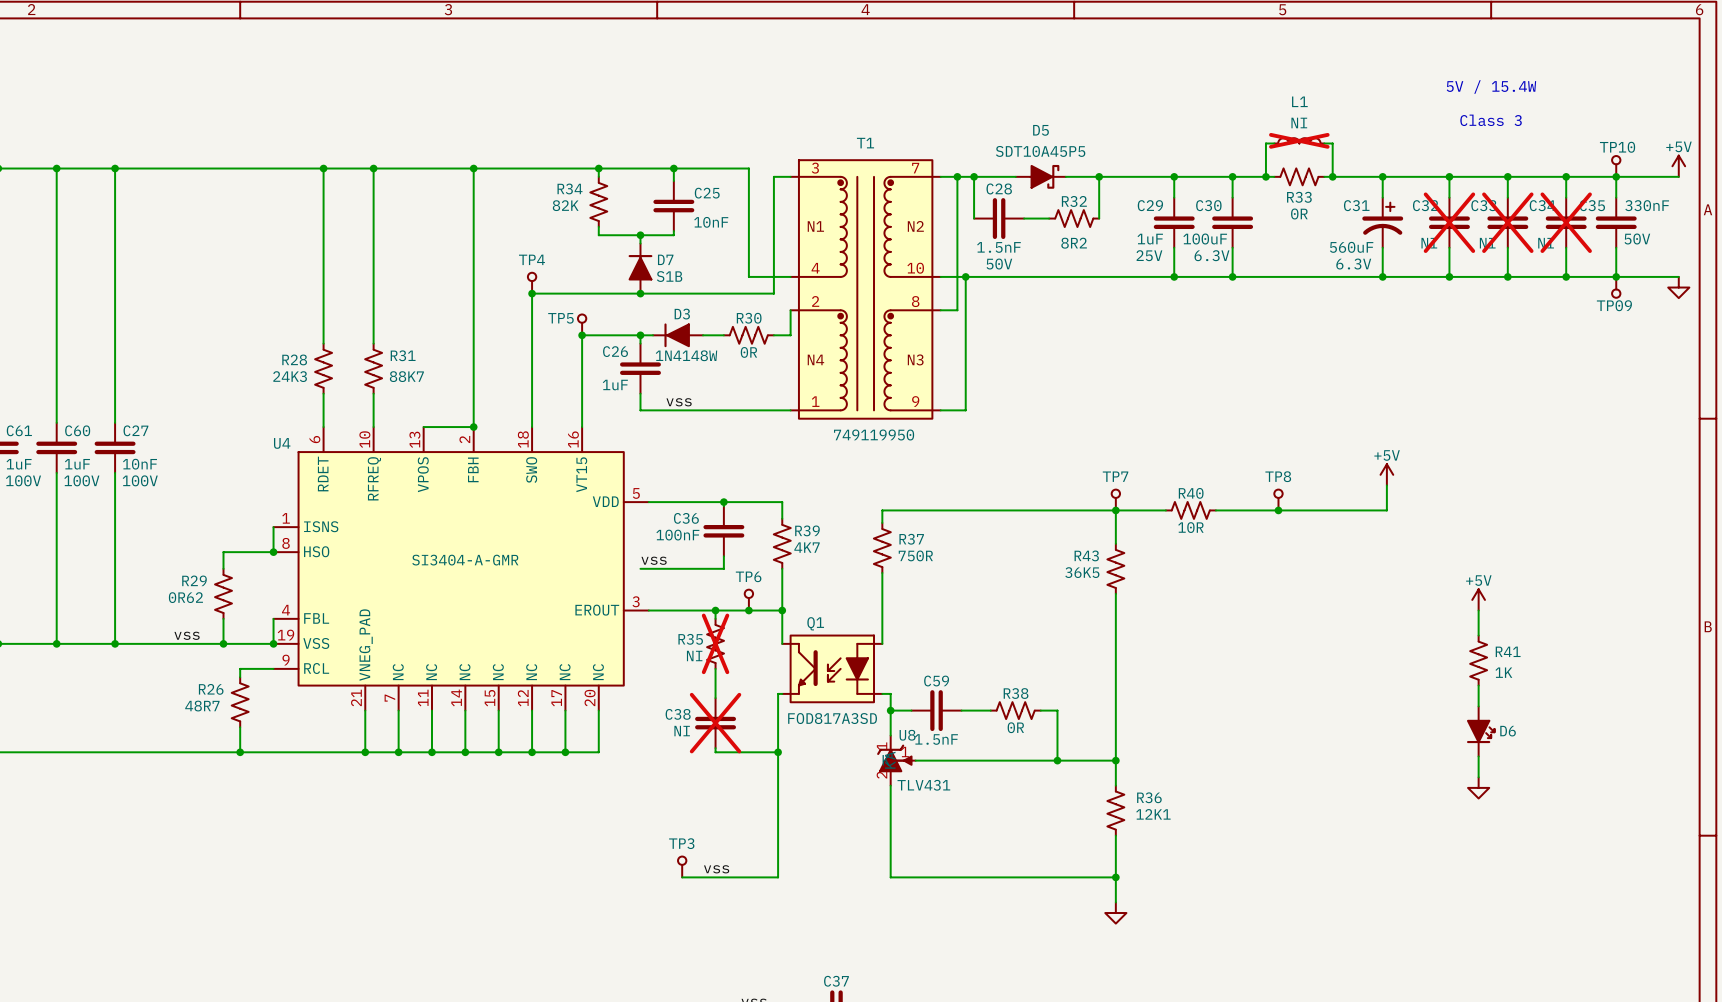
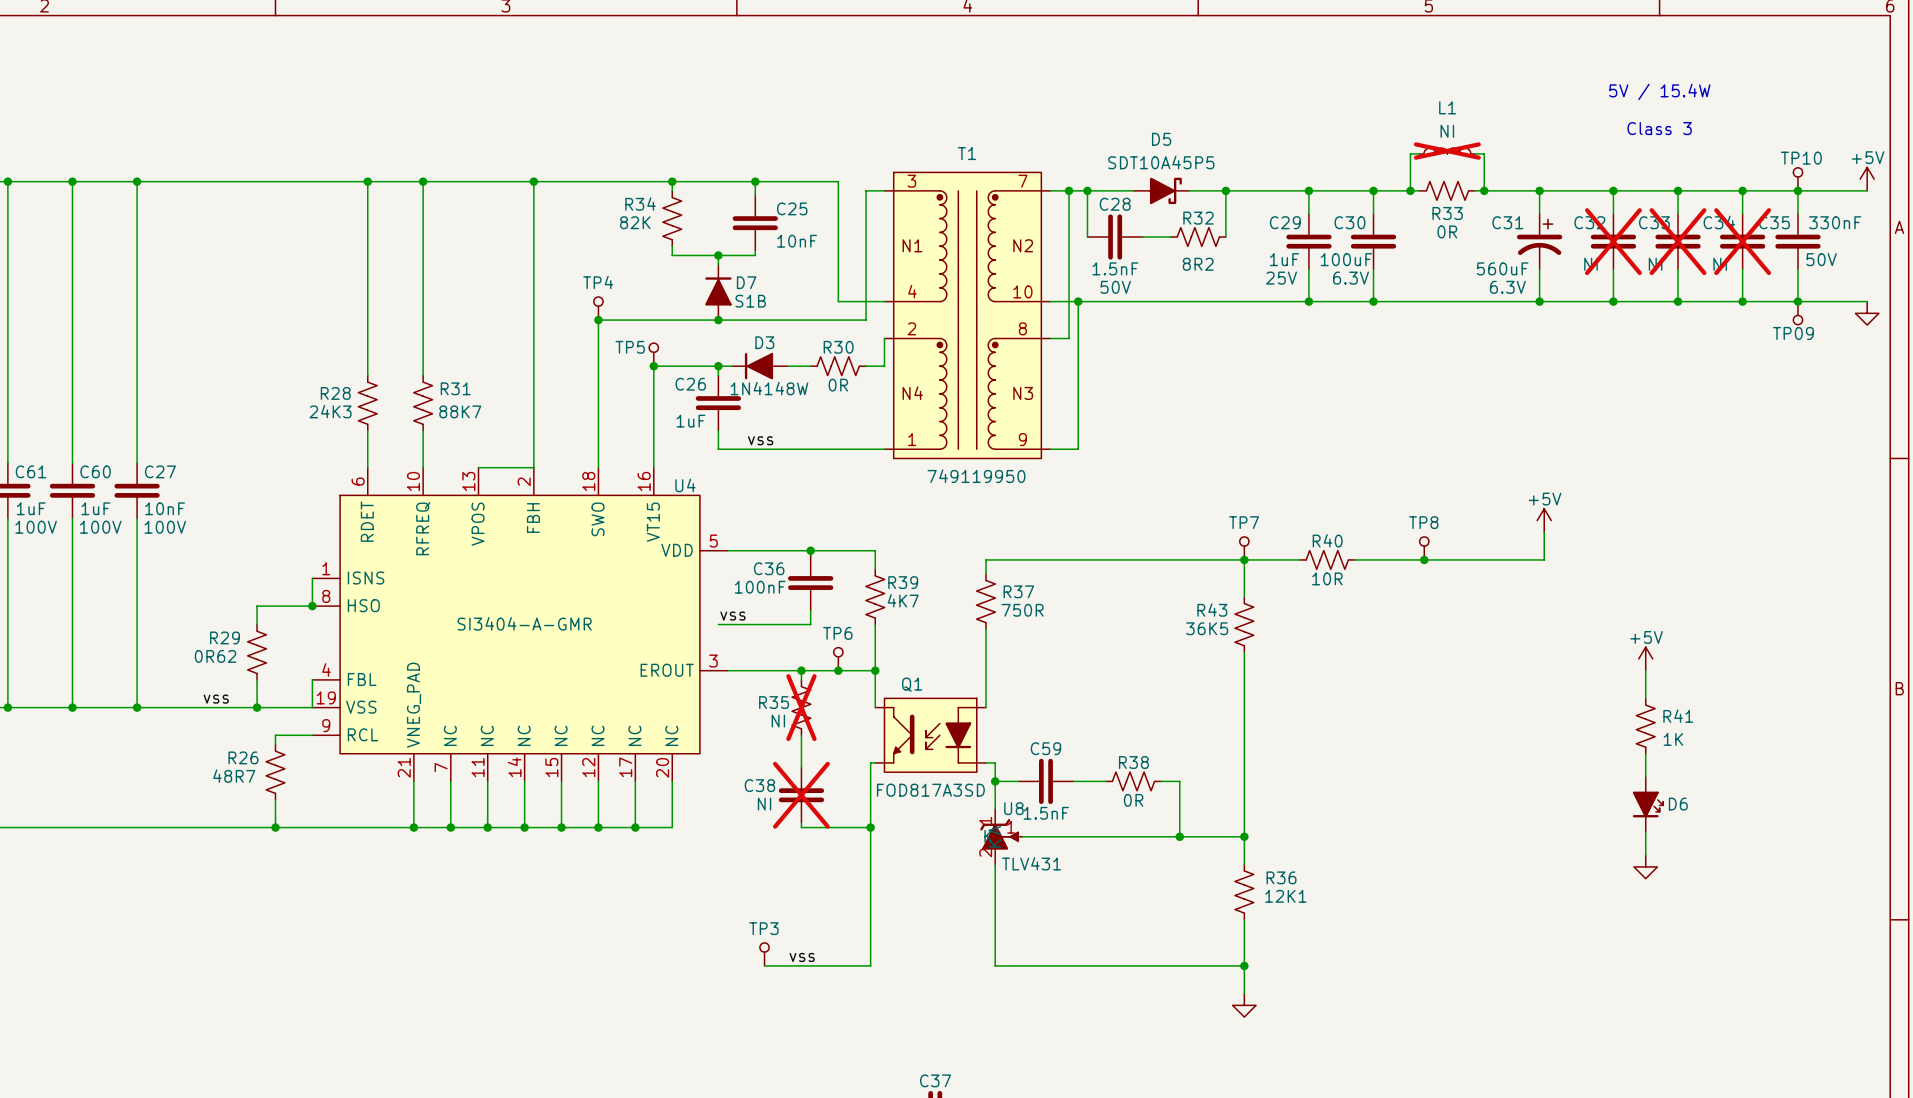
junction: (473, 427) -> none
U4 name position: U4 (282, 443) -> U4 (685, 485)
U4 text: SI3404-A-GMR (465, 560) -> none
U4 value: none -> SI3404-A-GMR (524, 623)
junction: (273, 643) -> none

